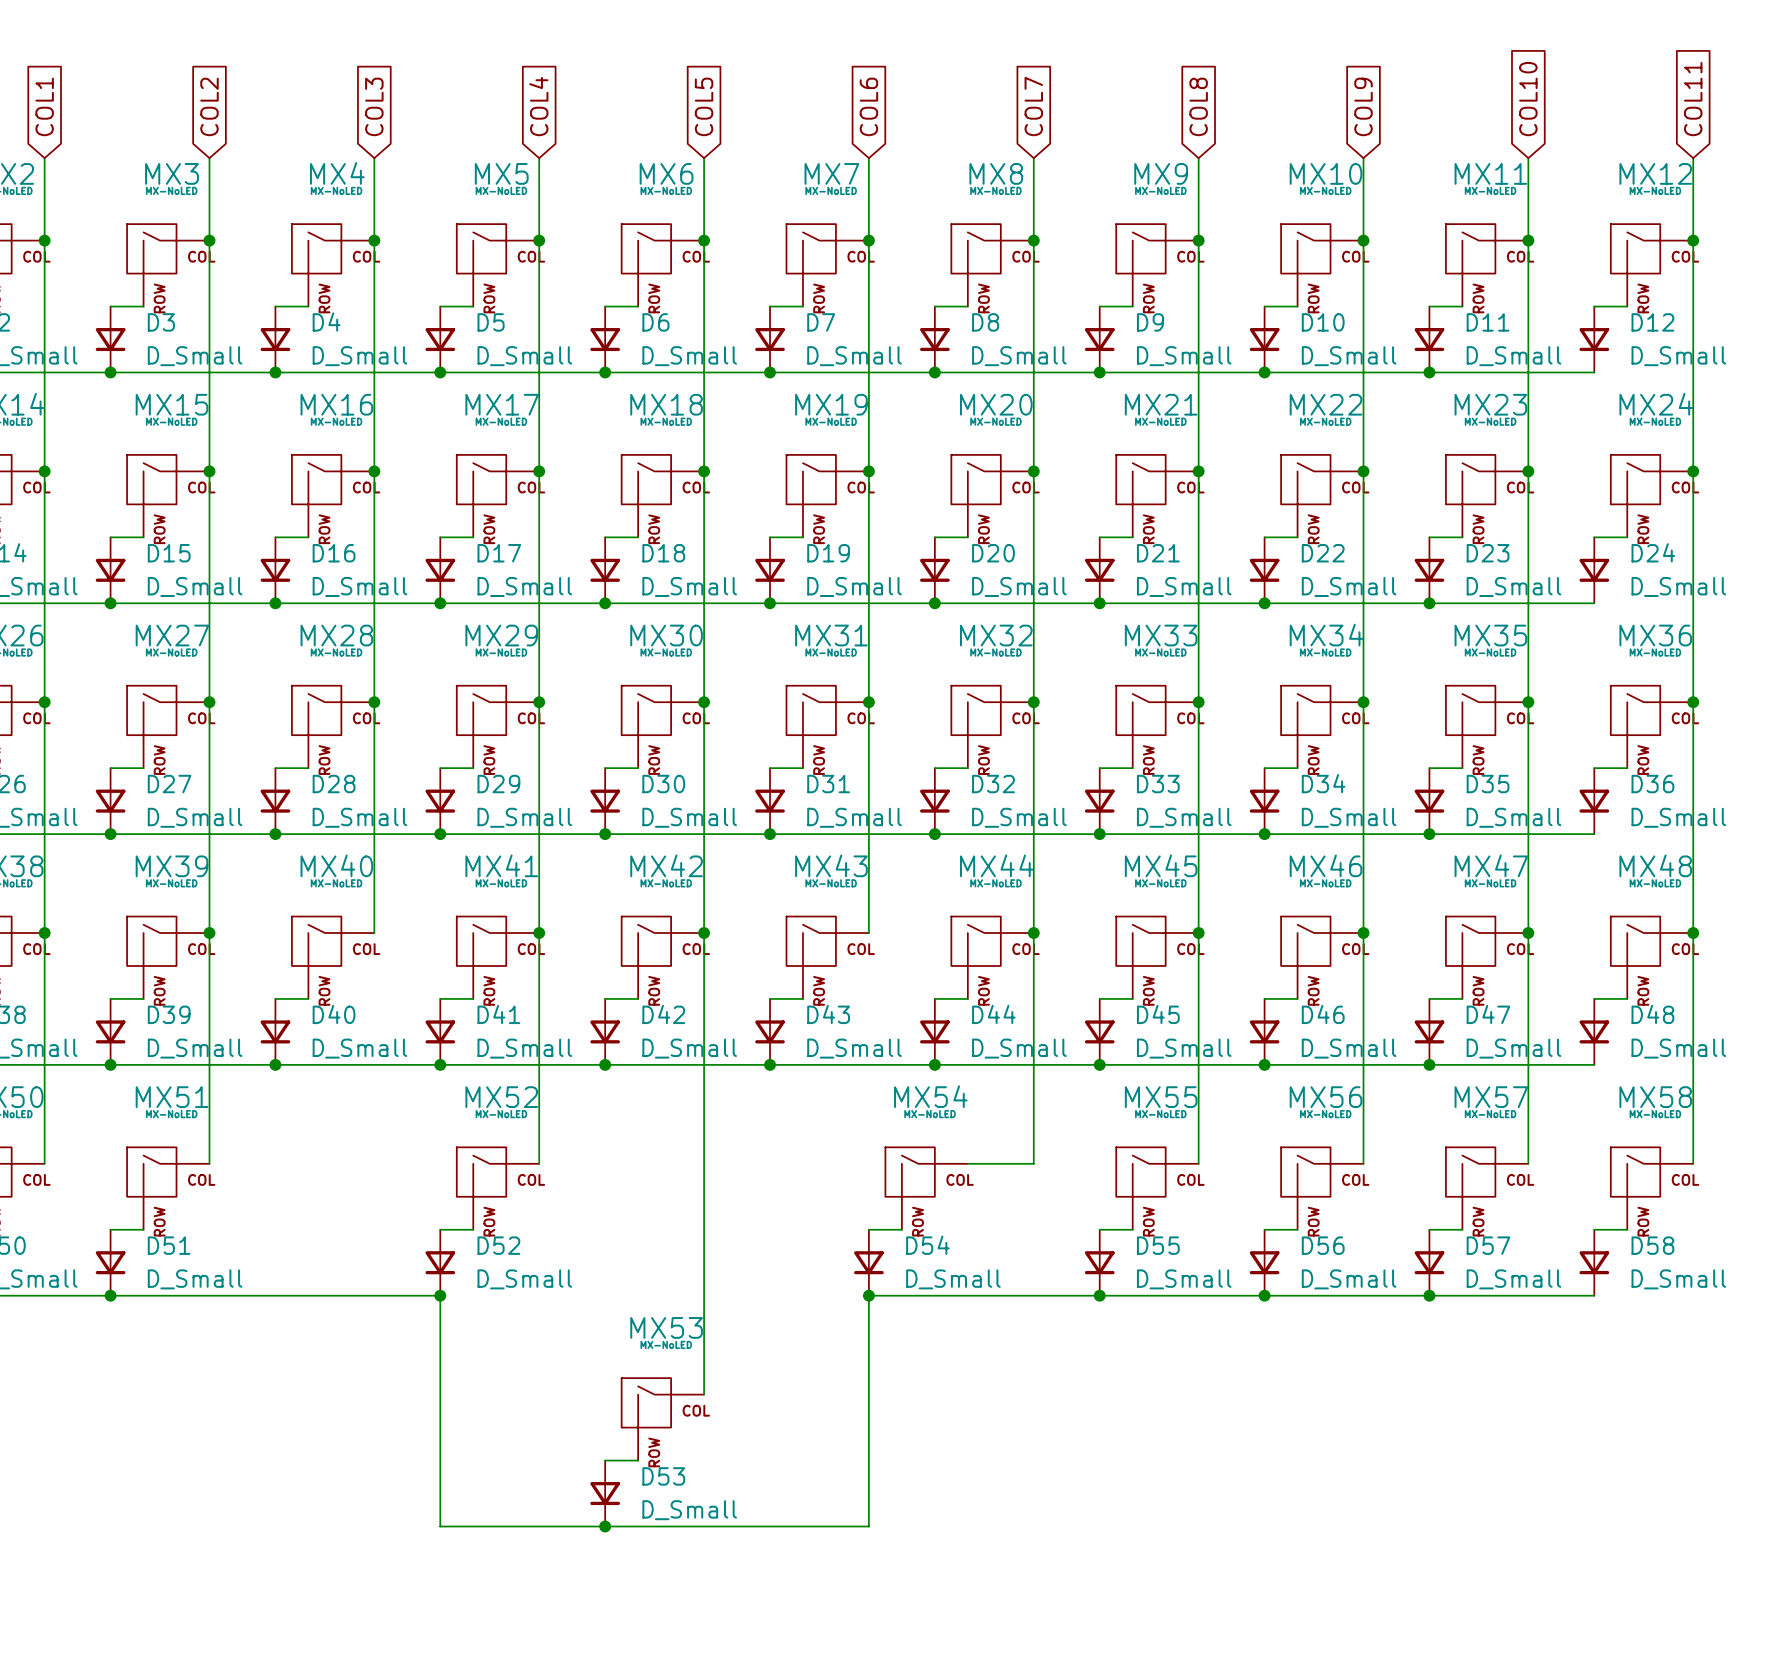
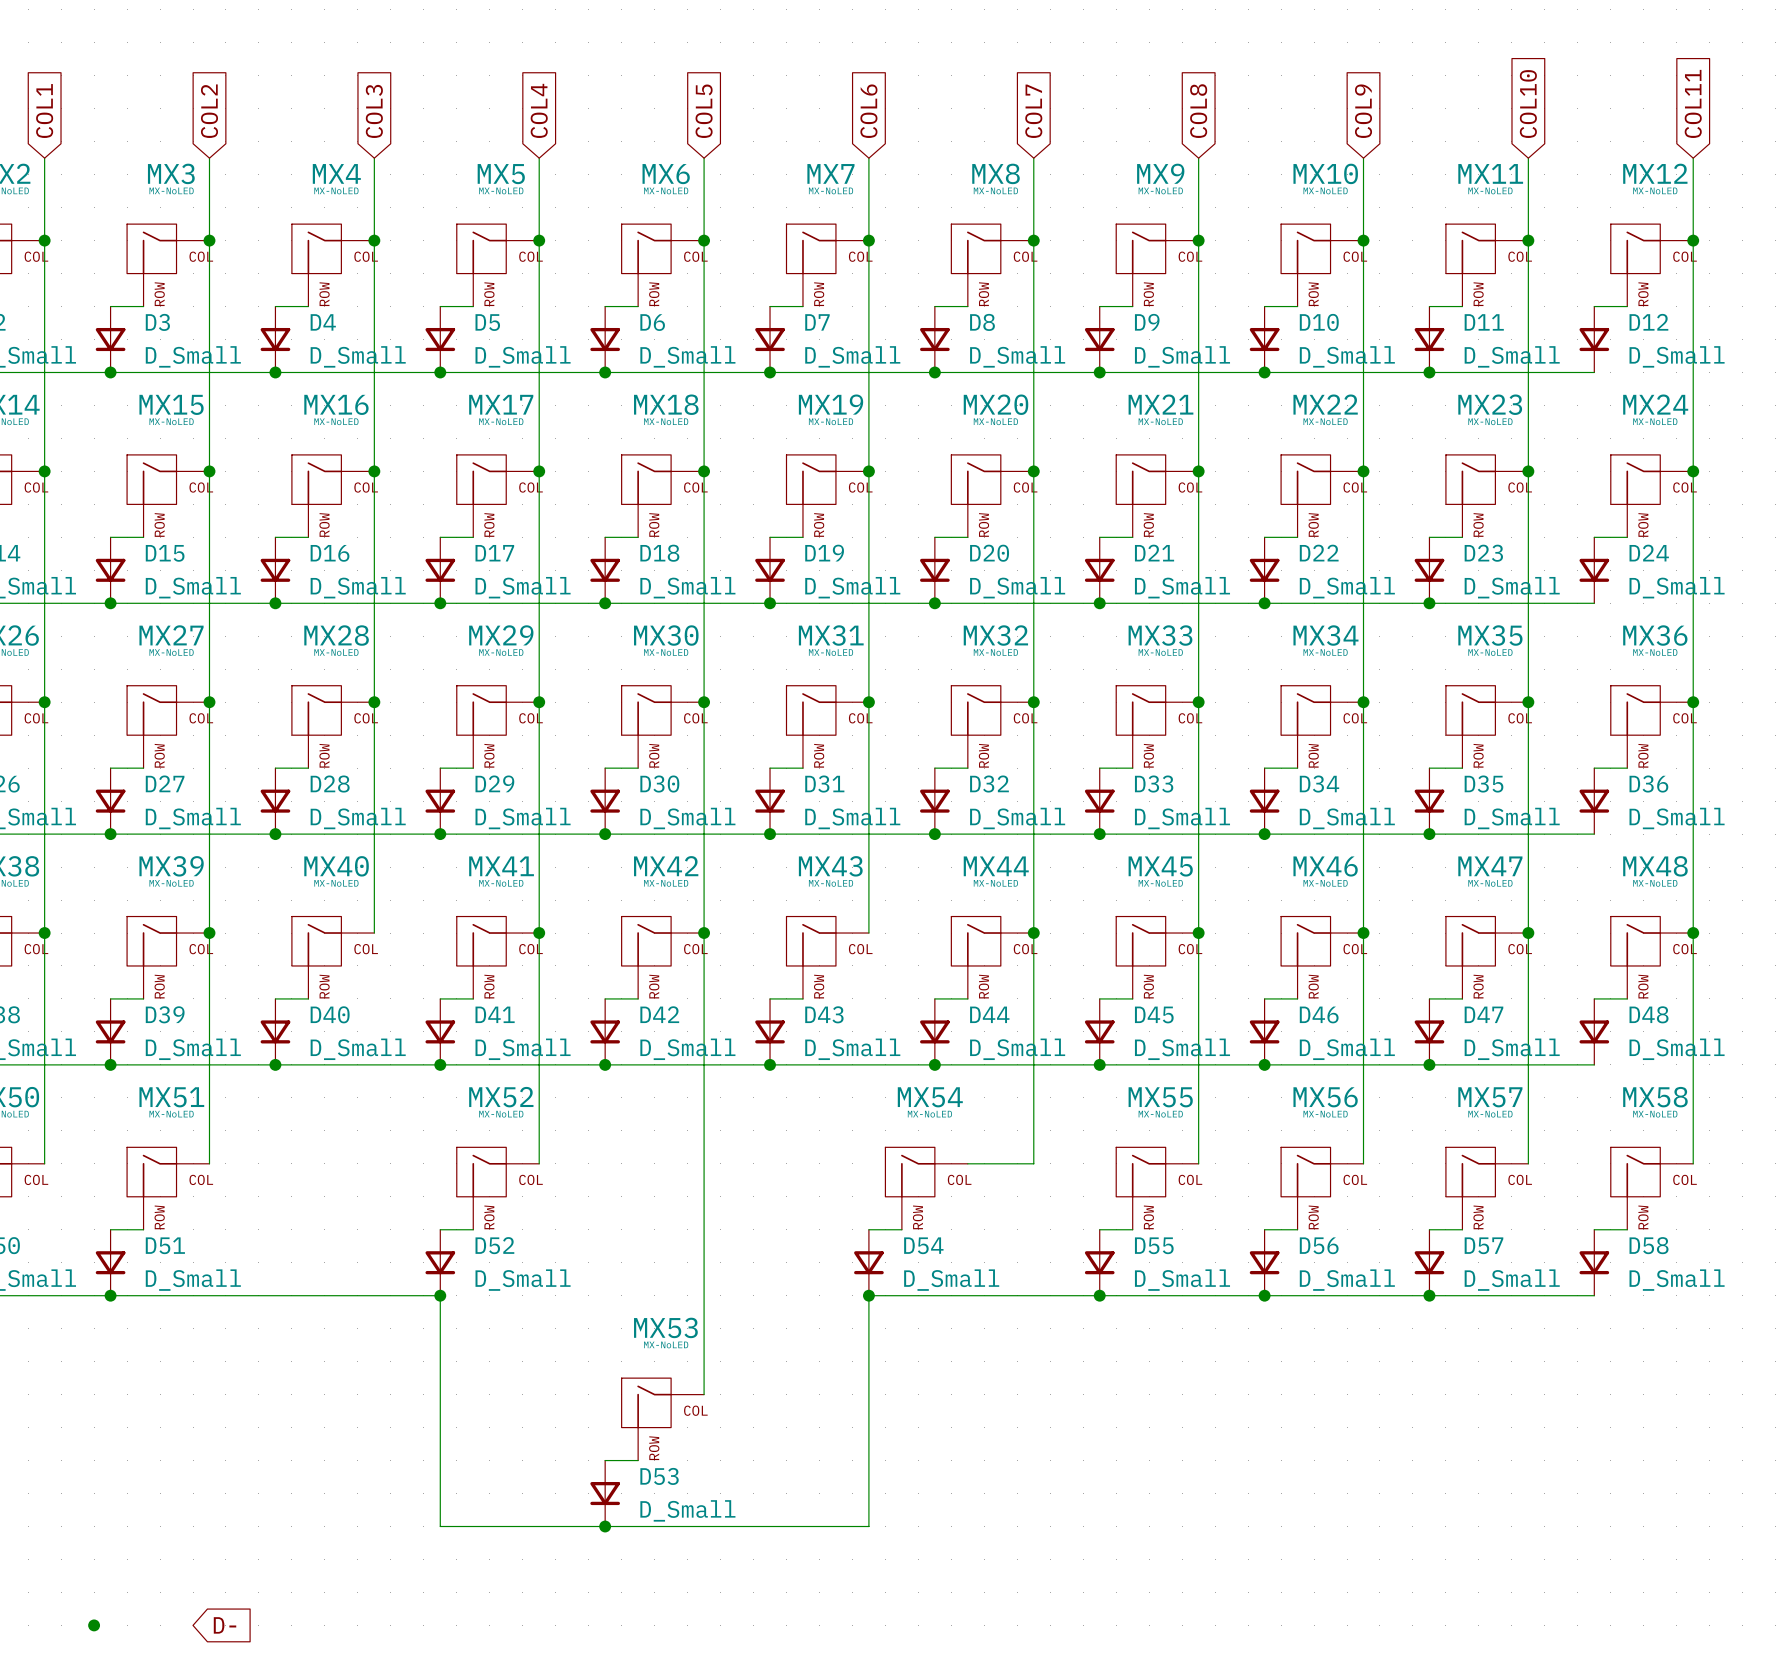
junction: none -> (94, 1625)
global label: none -> D- (225, 1625)

